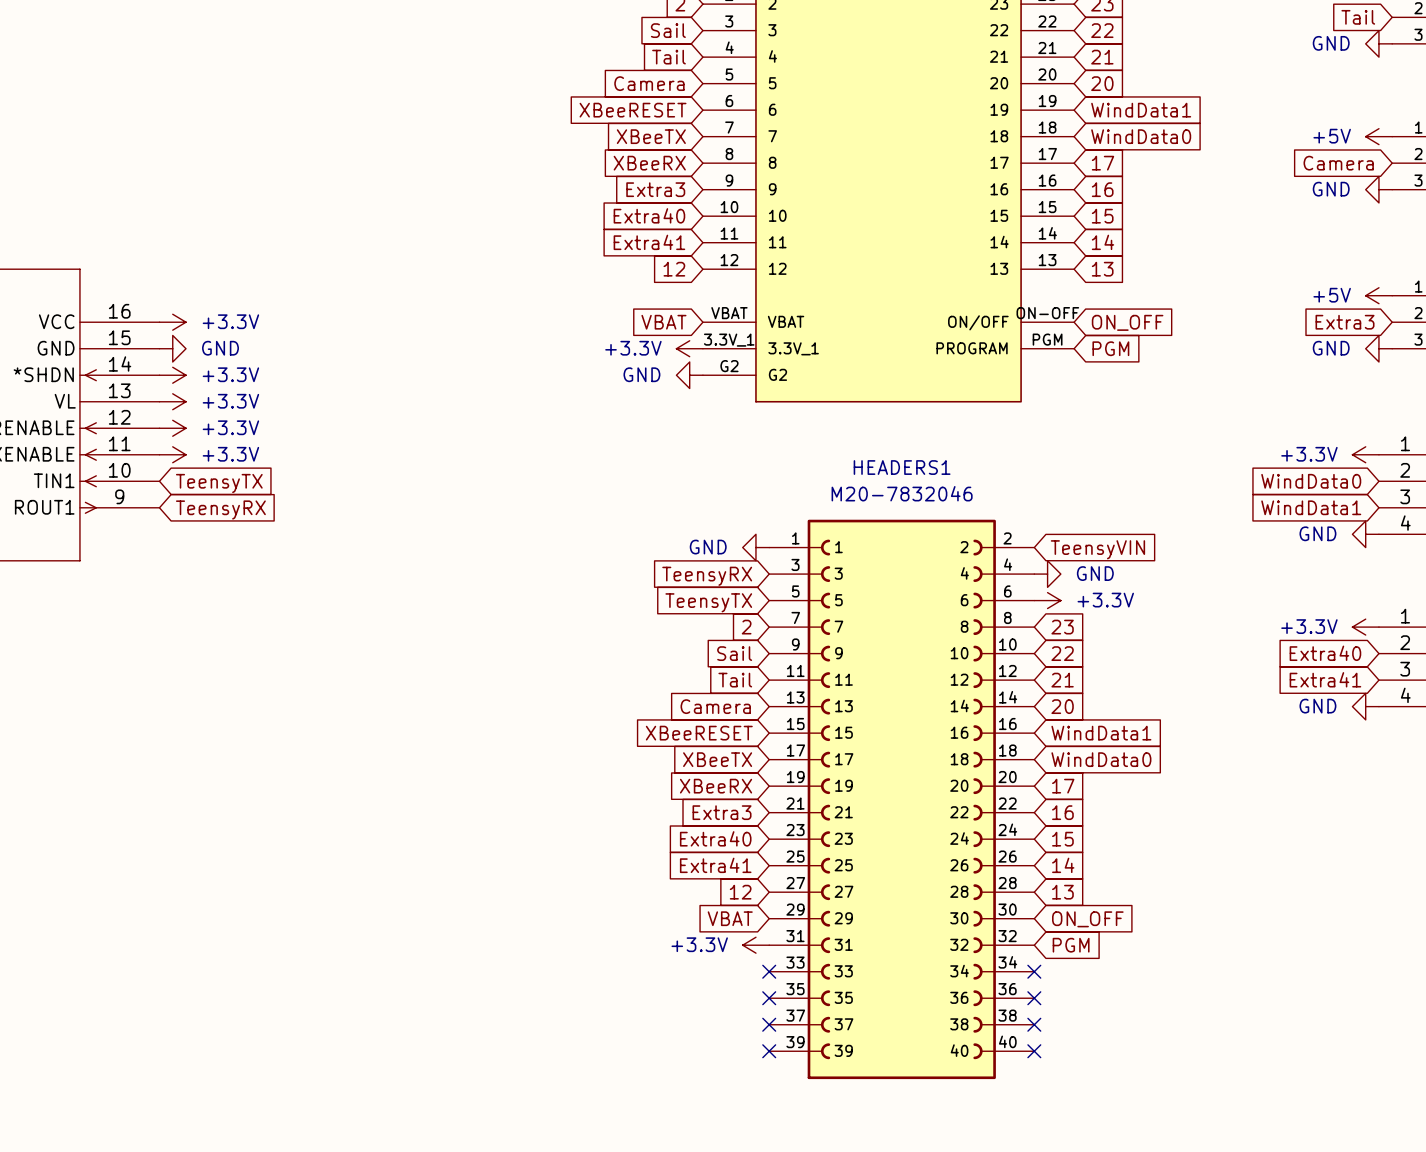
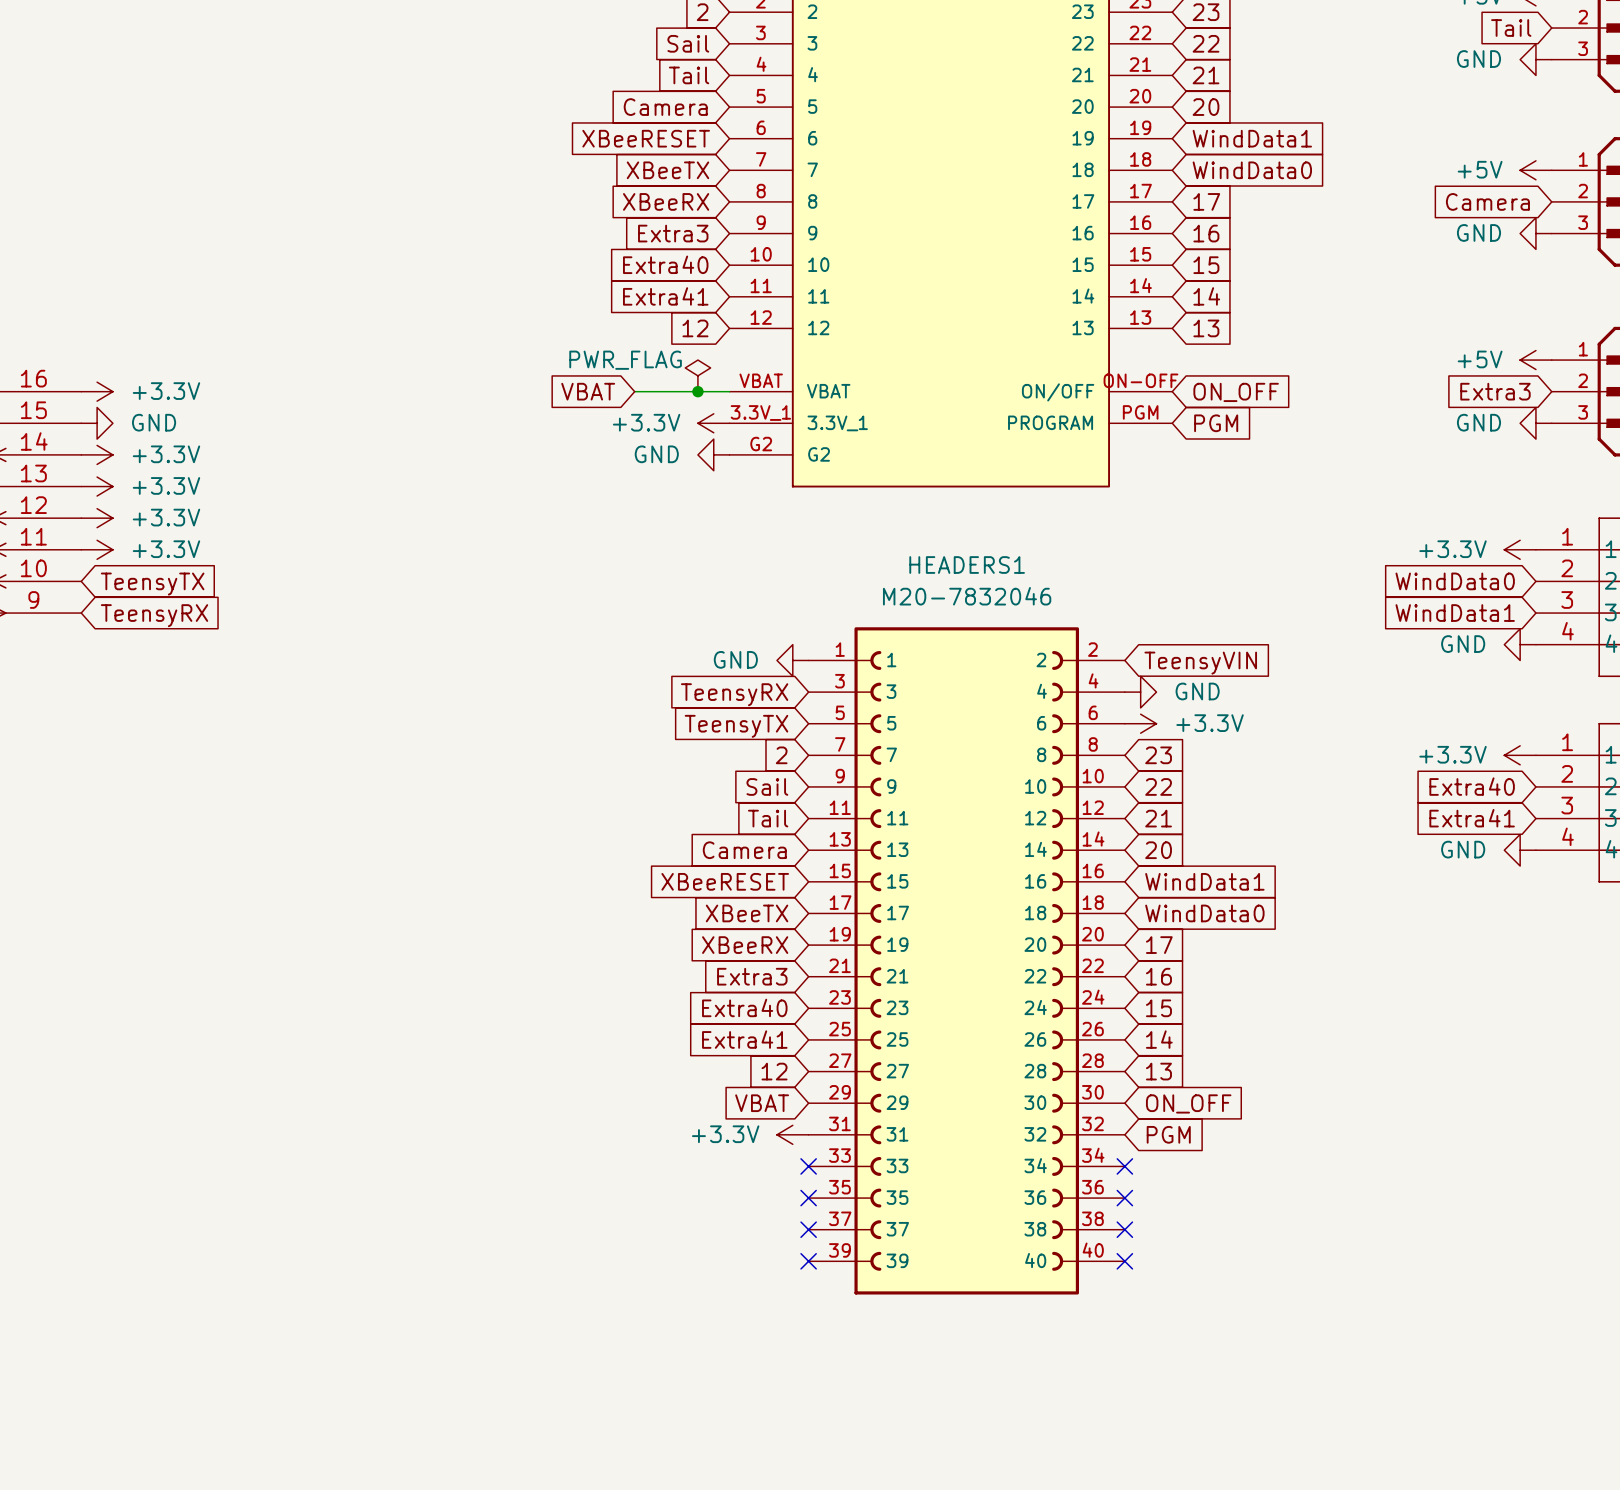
power symbol: none -> PWR_FLAG (697, 375)
wire: none -> (634, 391) (729, 391)
global label position: VBAT (663, 322) -> VBAT (588, 391)
junction: none -> (697, 391)

